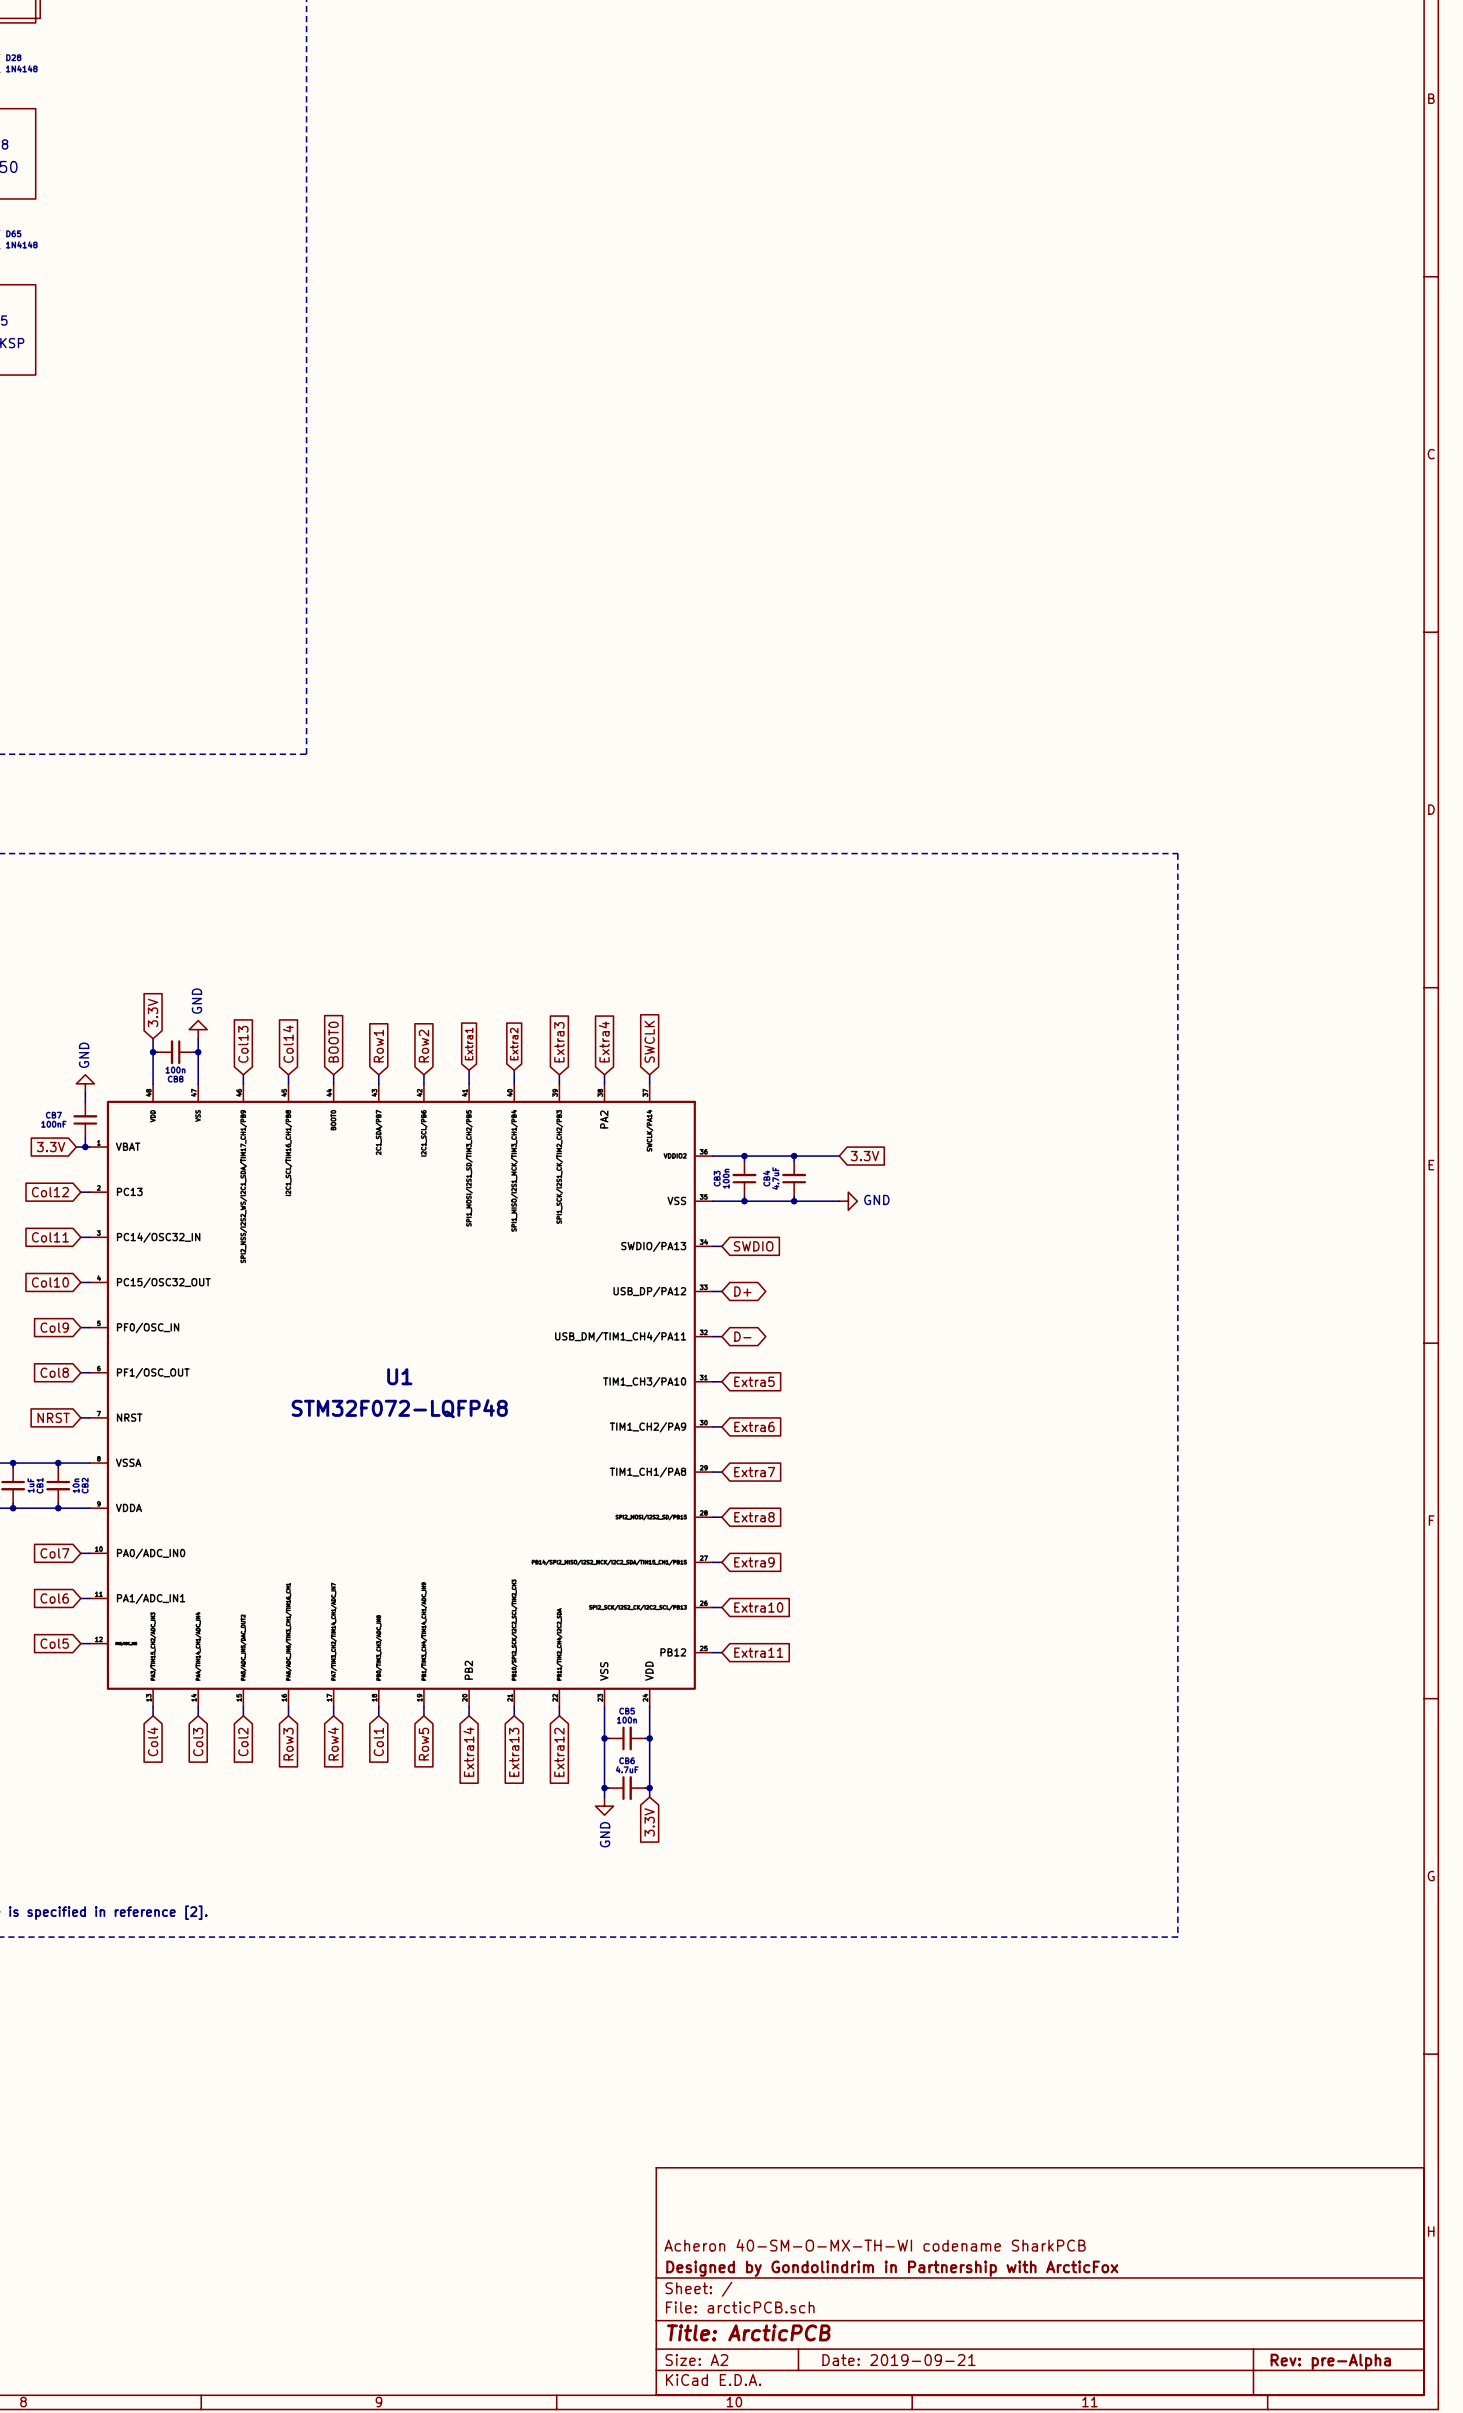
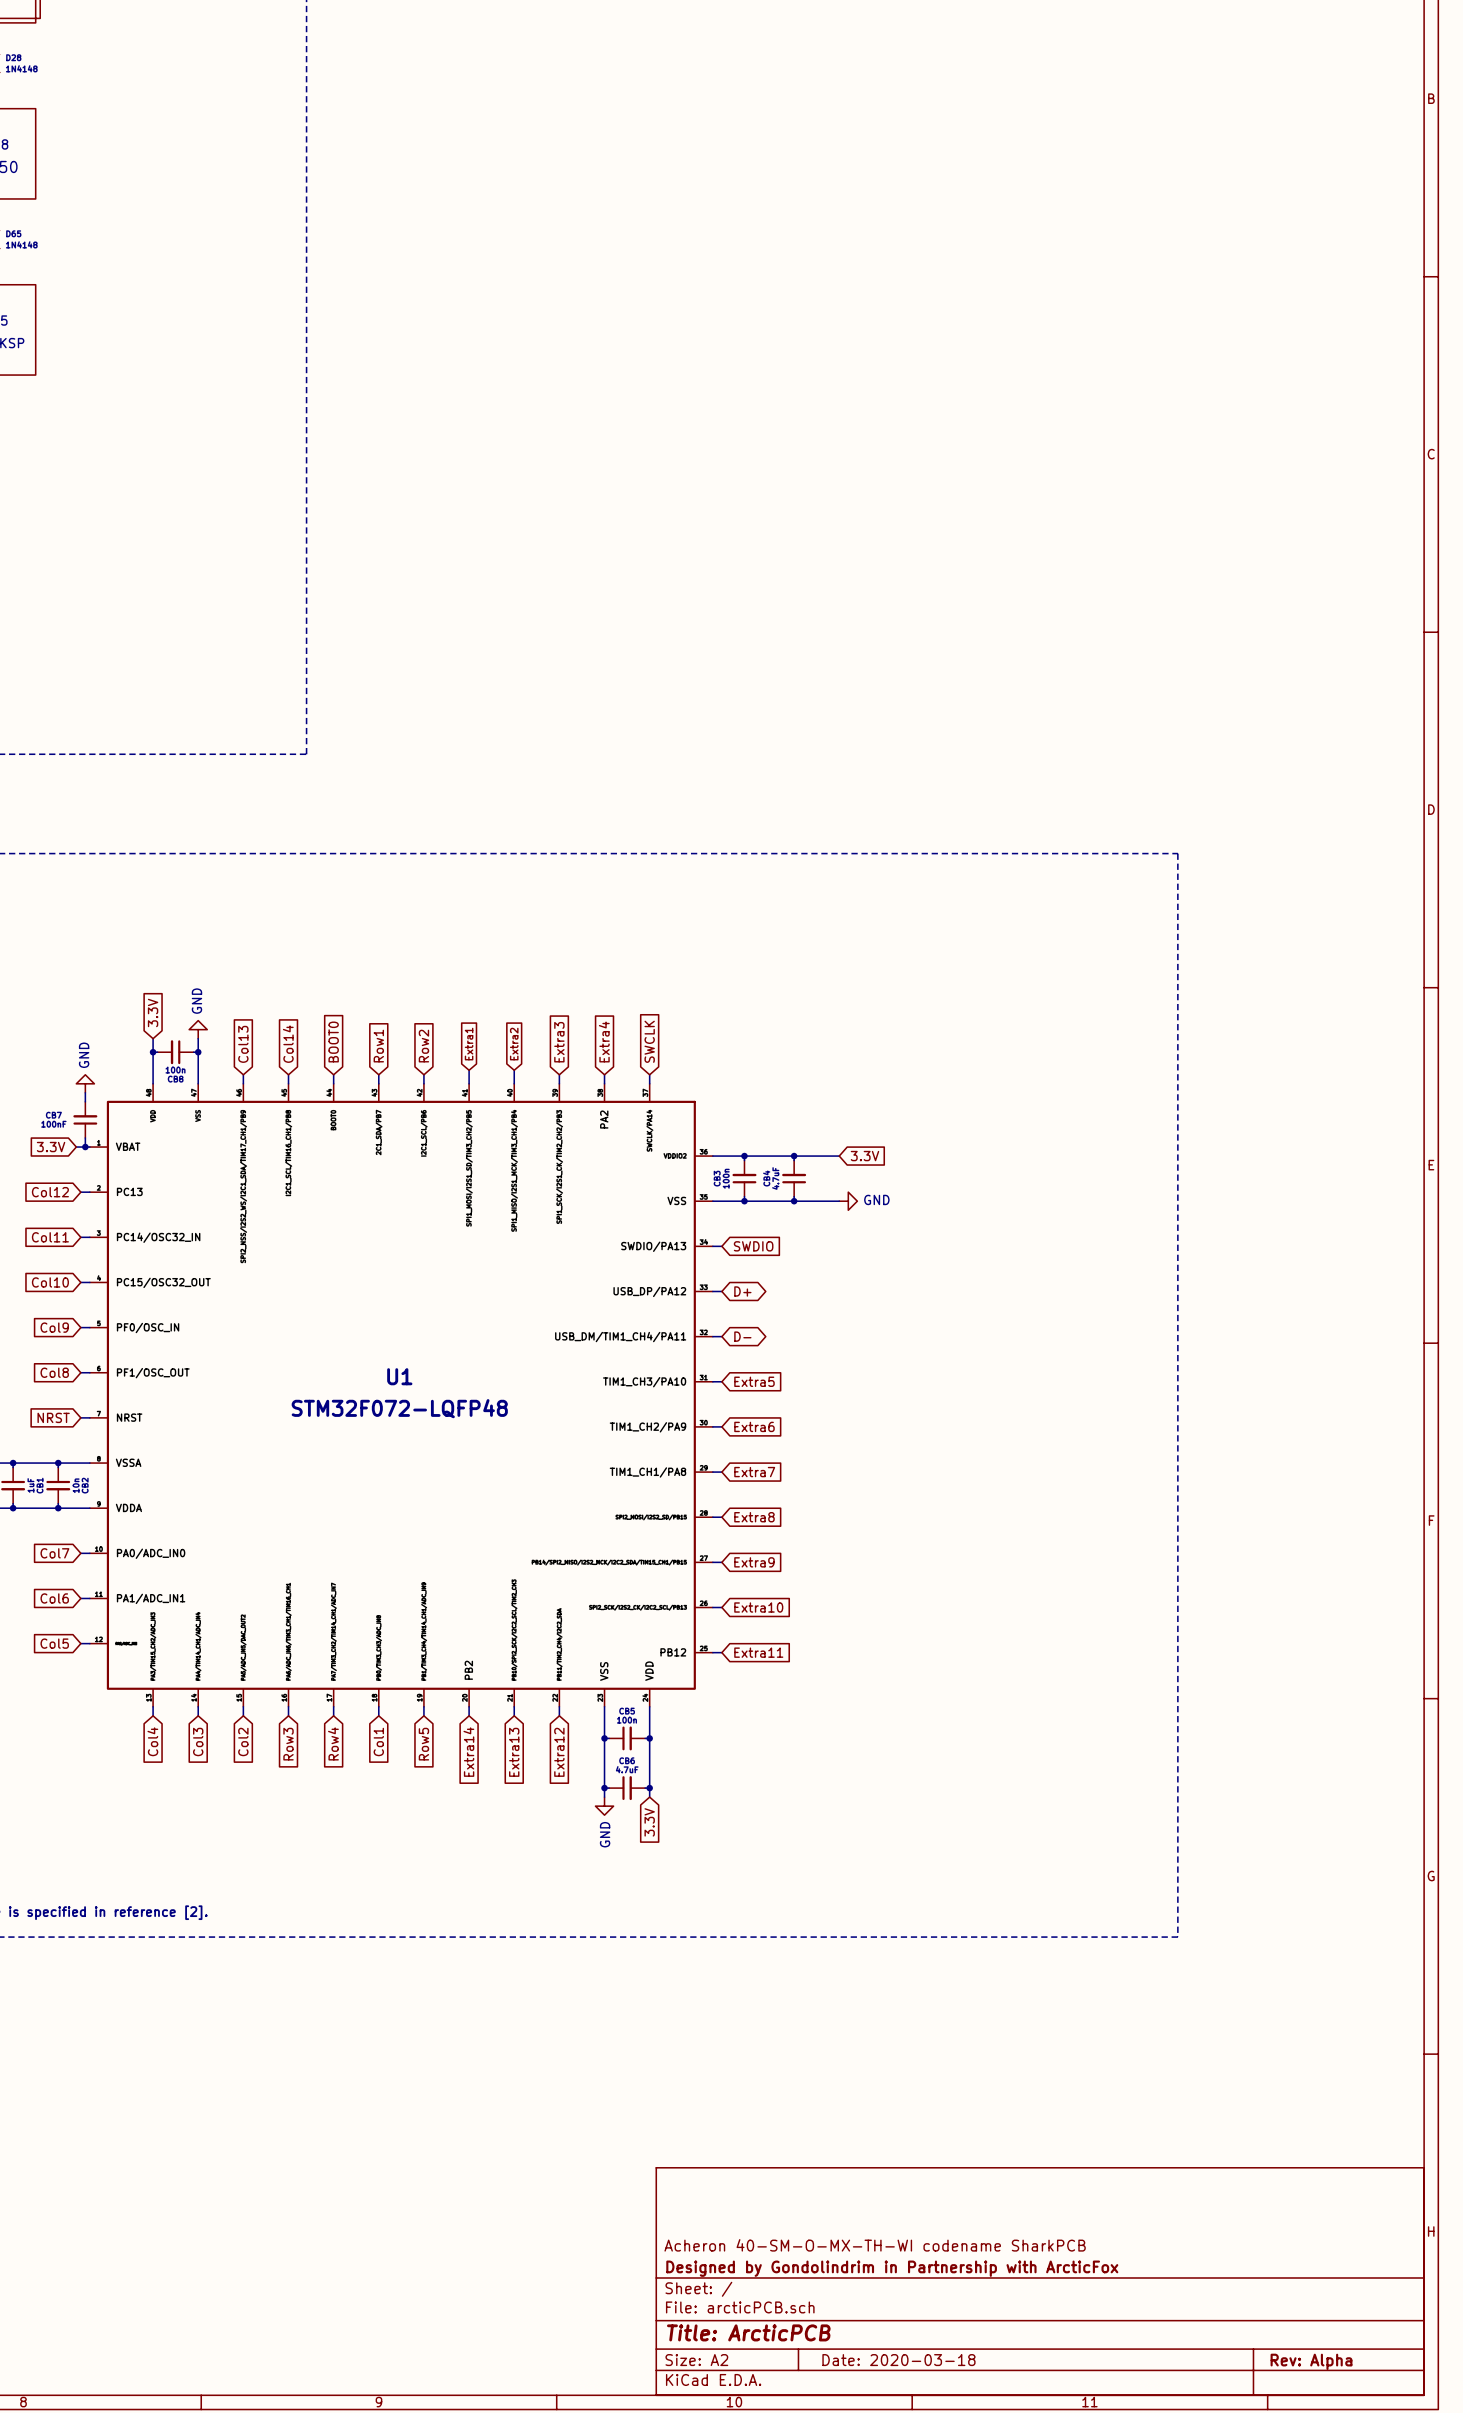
title block: Date: 2019-09-21 (898, 2360) -> Date: 2020-03-18 (898, 2360)
title block: Rev: pre-Alpha (1330, 2361) -> Rev: Alpha (1311, 2361)

